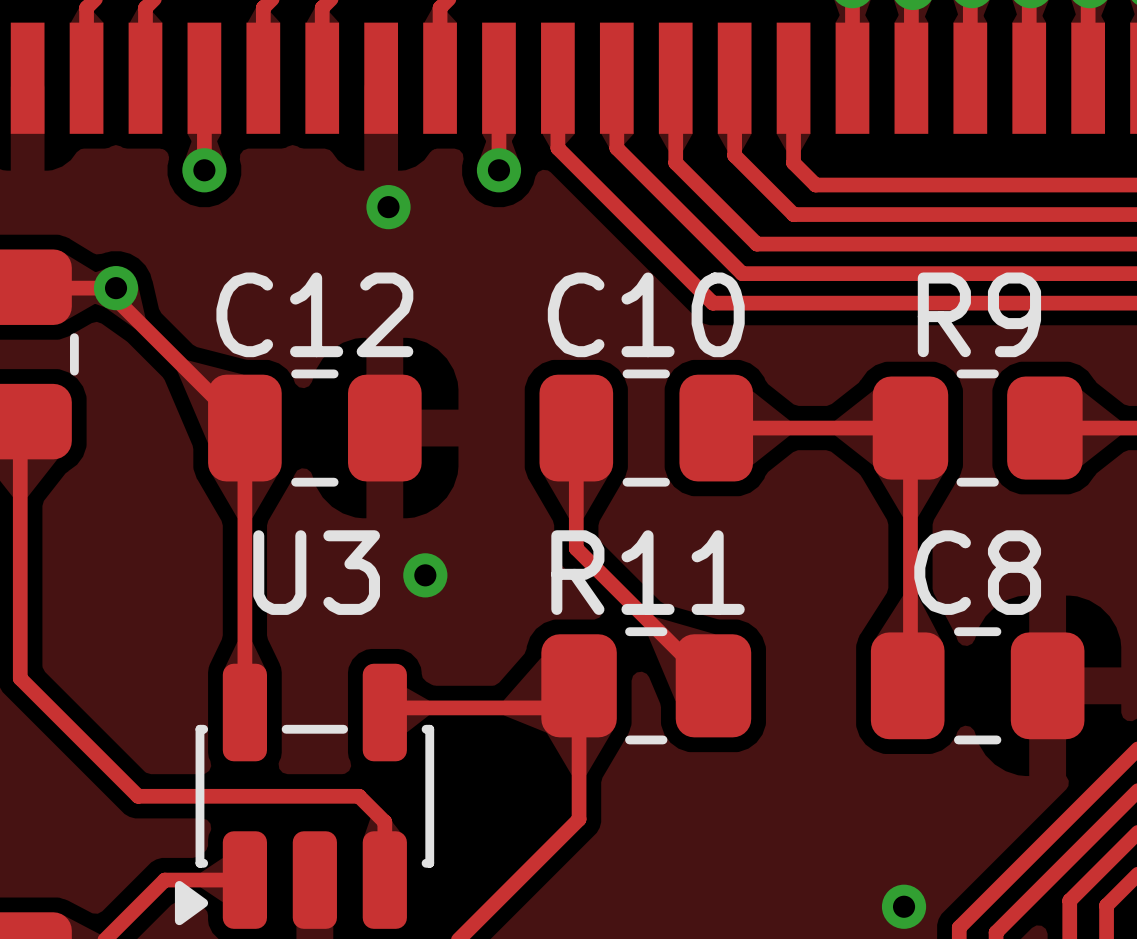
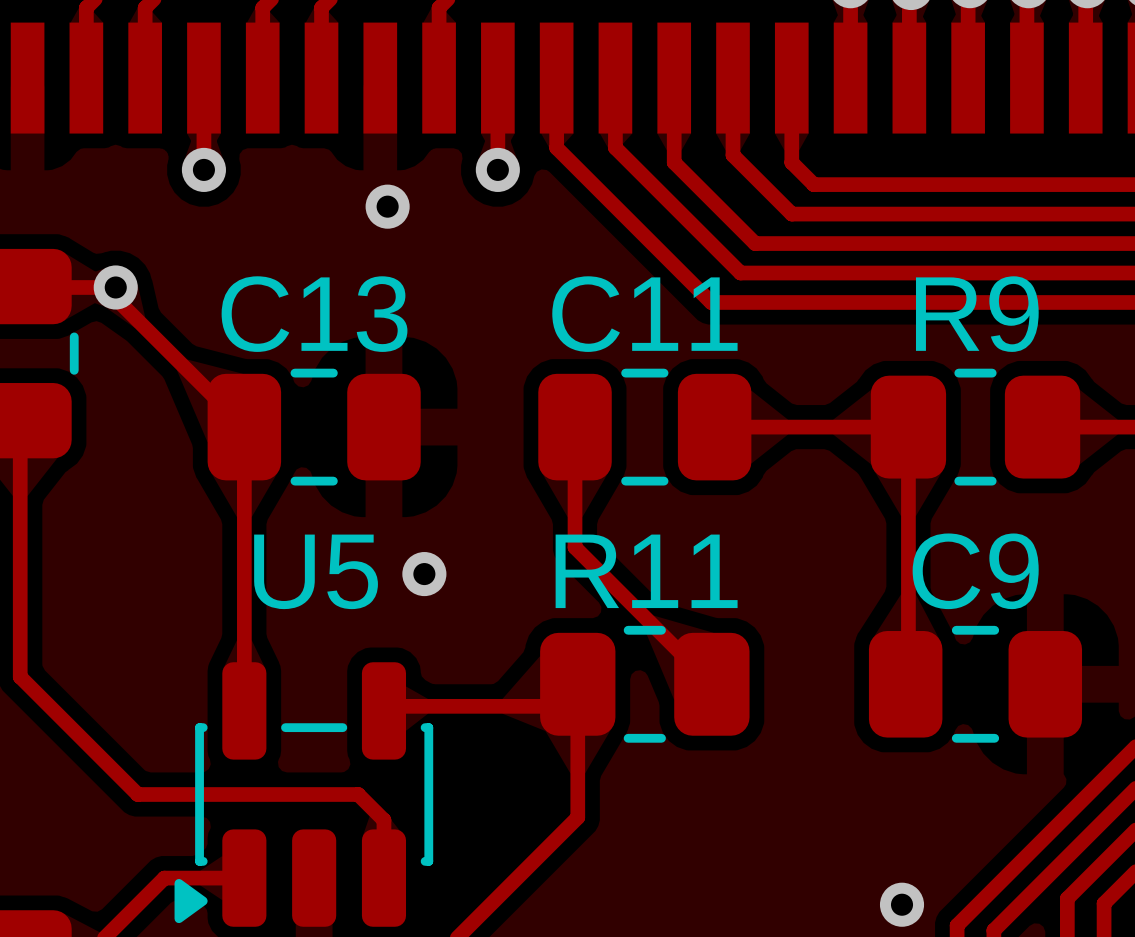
C12 name: C12 (314, 314) -> C13 (314, 314)
C10 name: C10 (646, 314) -> C11 (644, 314)
U3 name: U3 (316, 572) -> U5 (316, 571)
C8 name: C8 (977, 572) -> C9 (975, 571)

